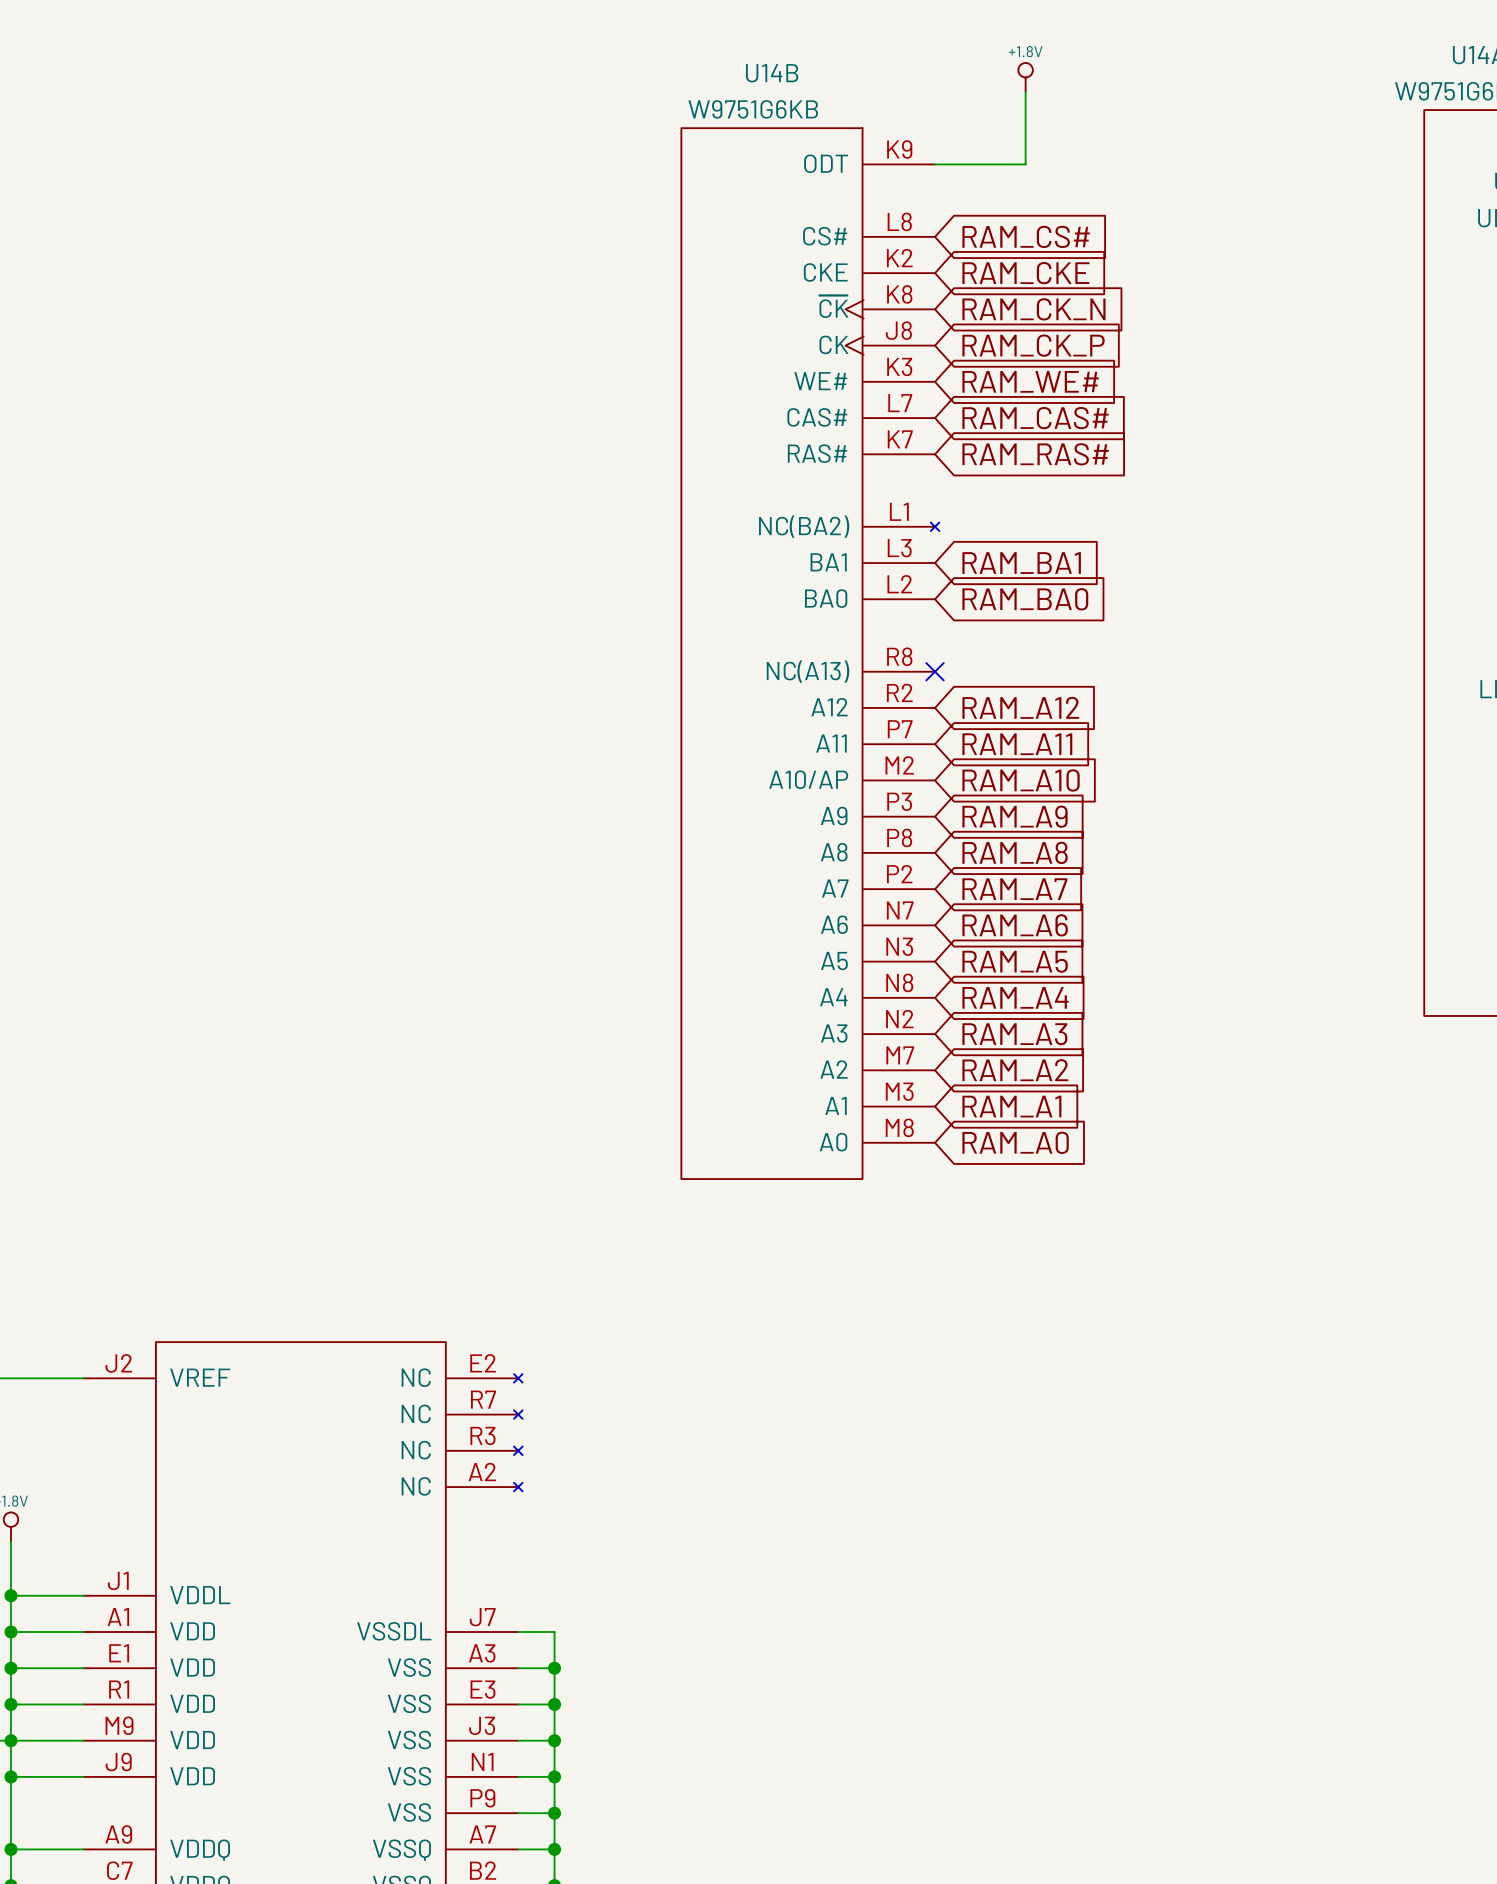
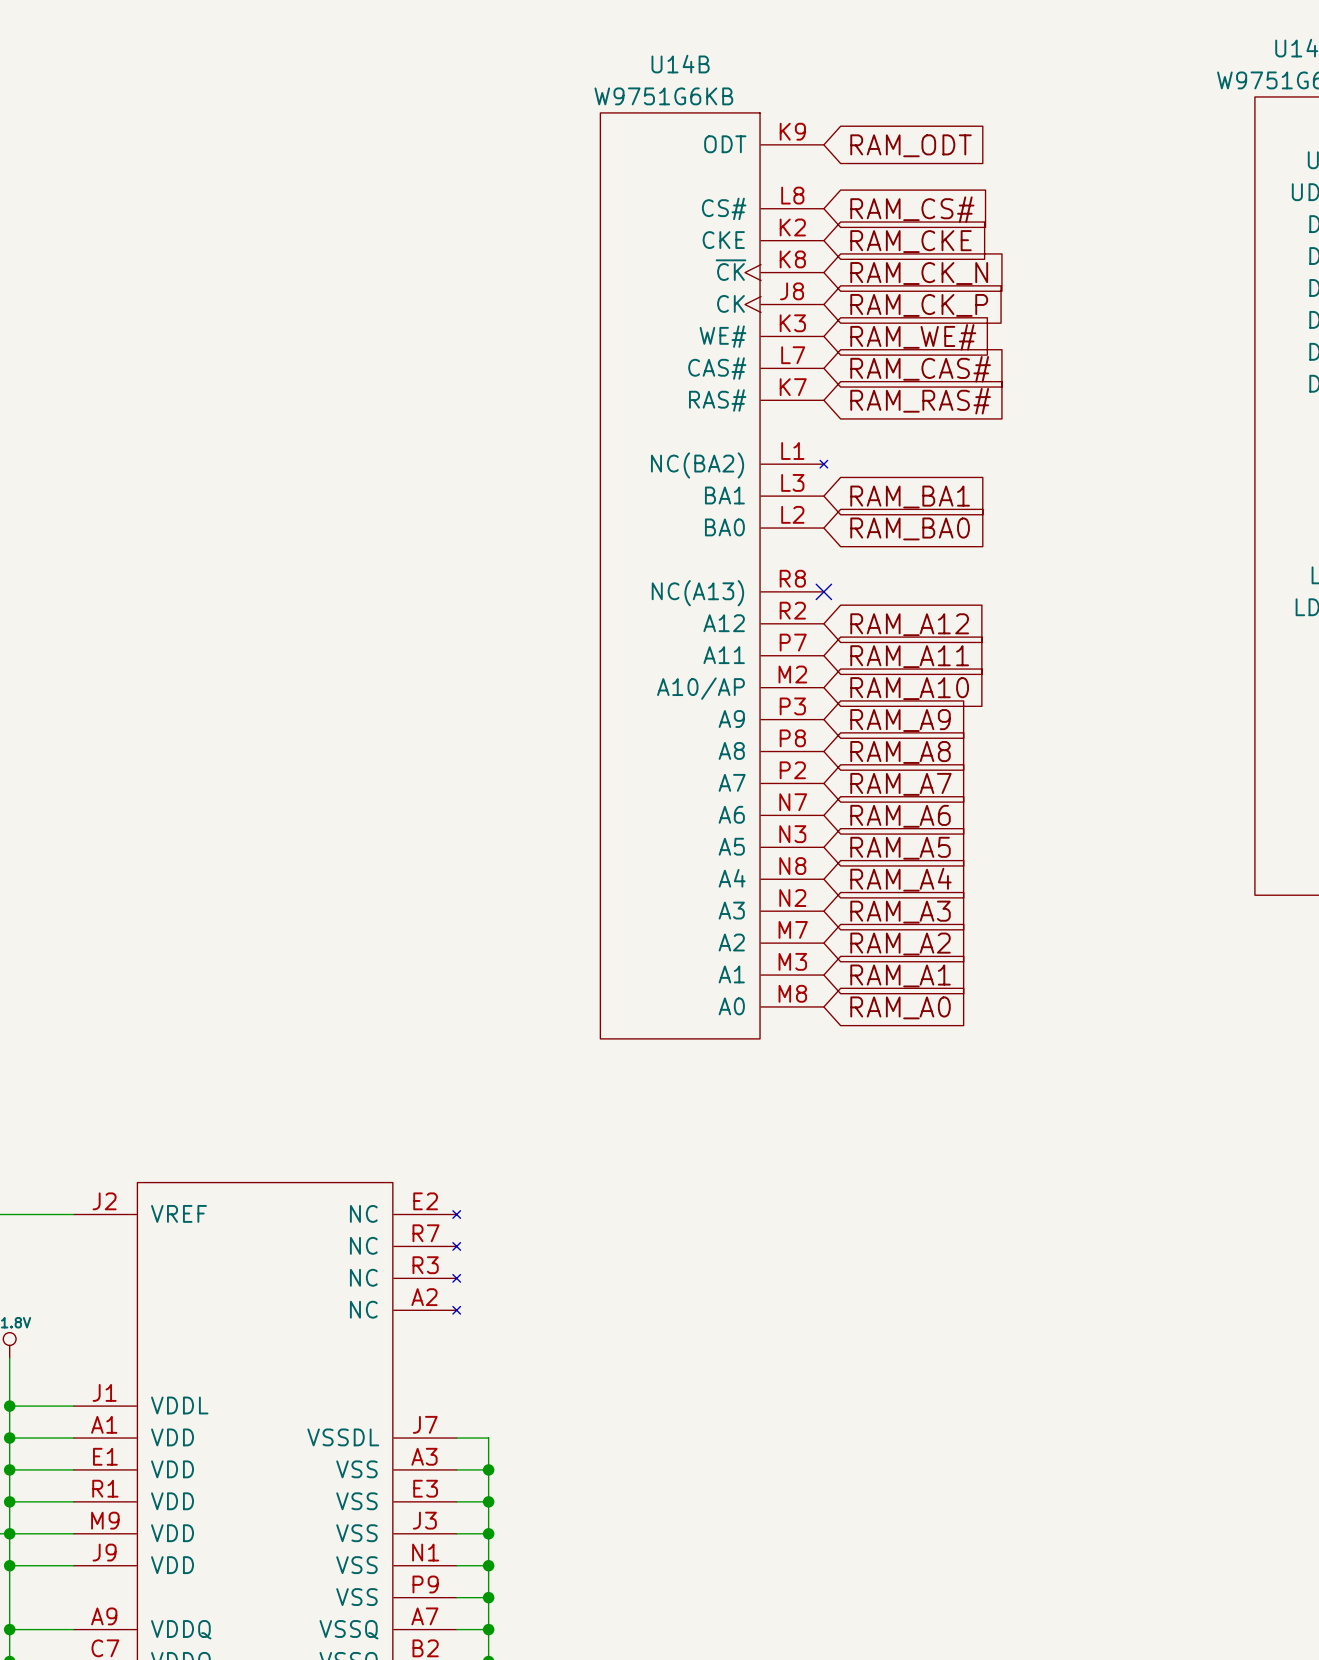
power symbol: +1.8V (1025, 77) -> none
wire: (1025, 91) (1025, 164) (935, 164) -> none
global label: none -> RAM_ODT (911, 145)

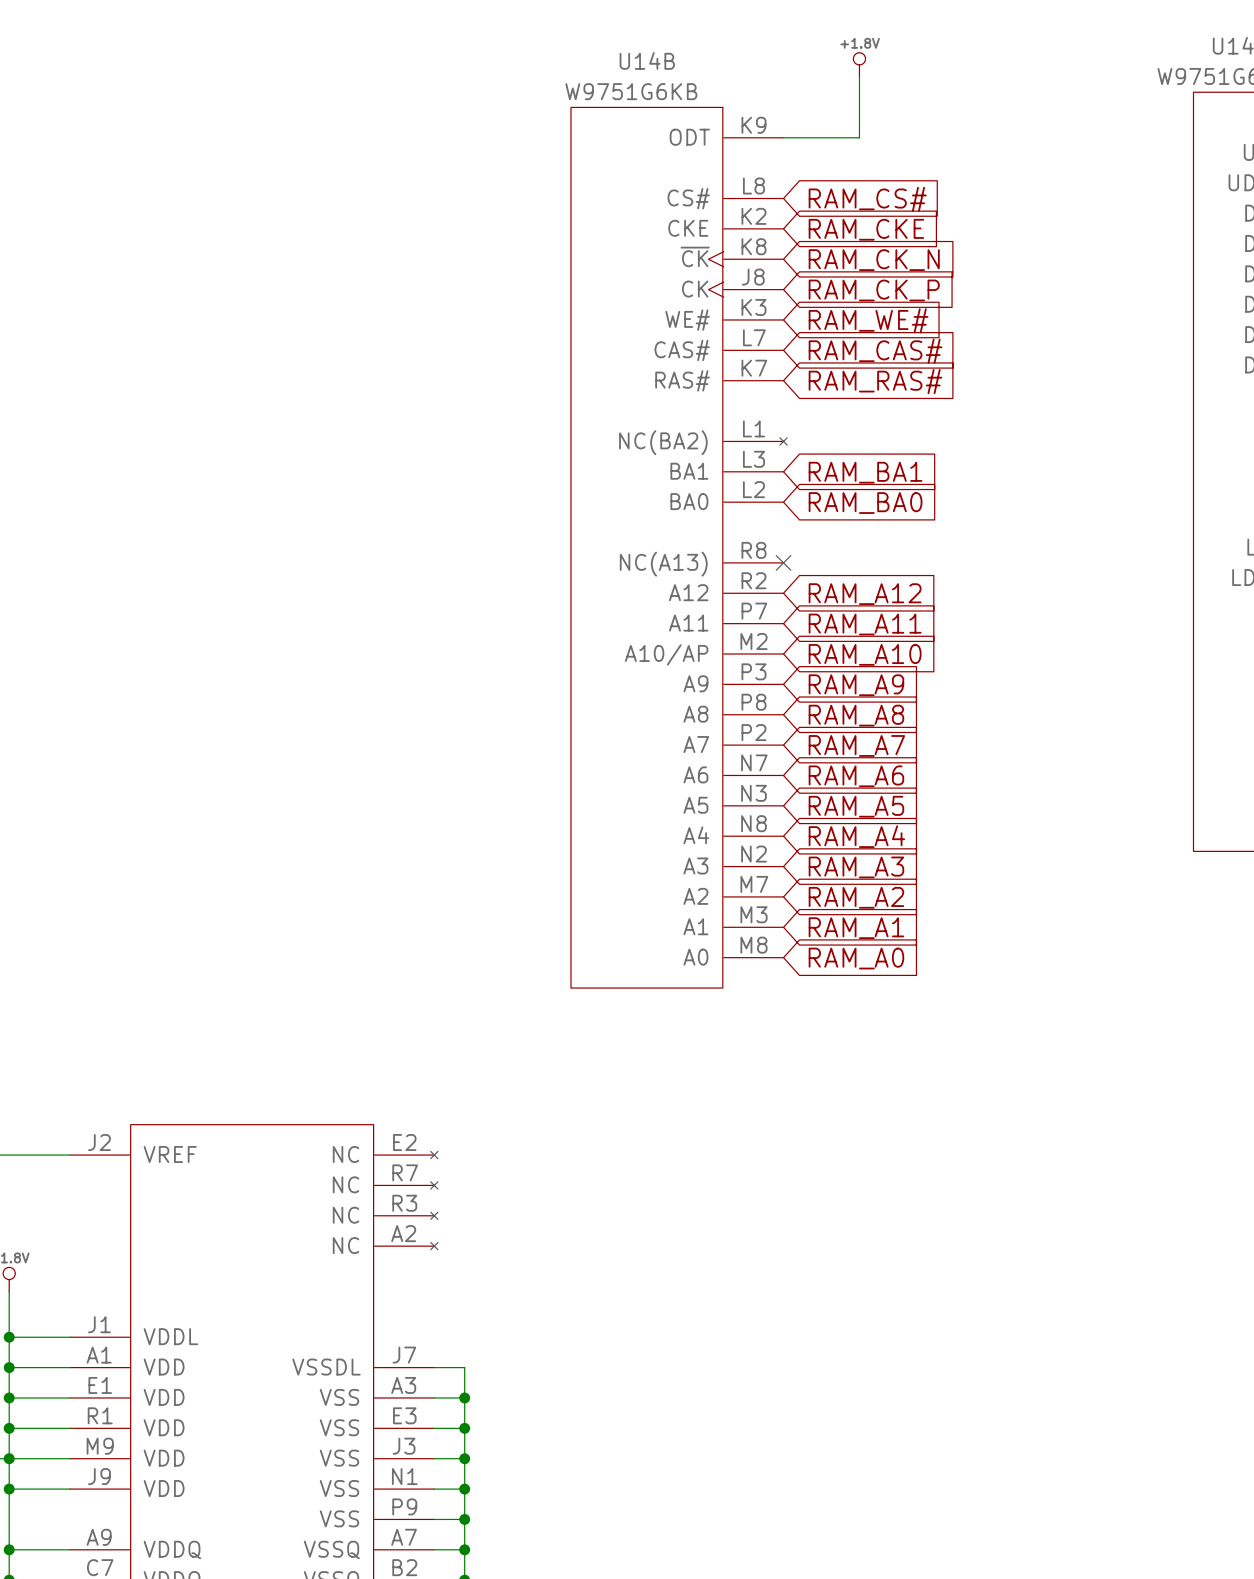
power symbol: none -> +1.8V (859, 64)
wire: none -> (859, 77) (859, 137) (783, 137)
global label: RAM_ODT (911, 145) -> none

